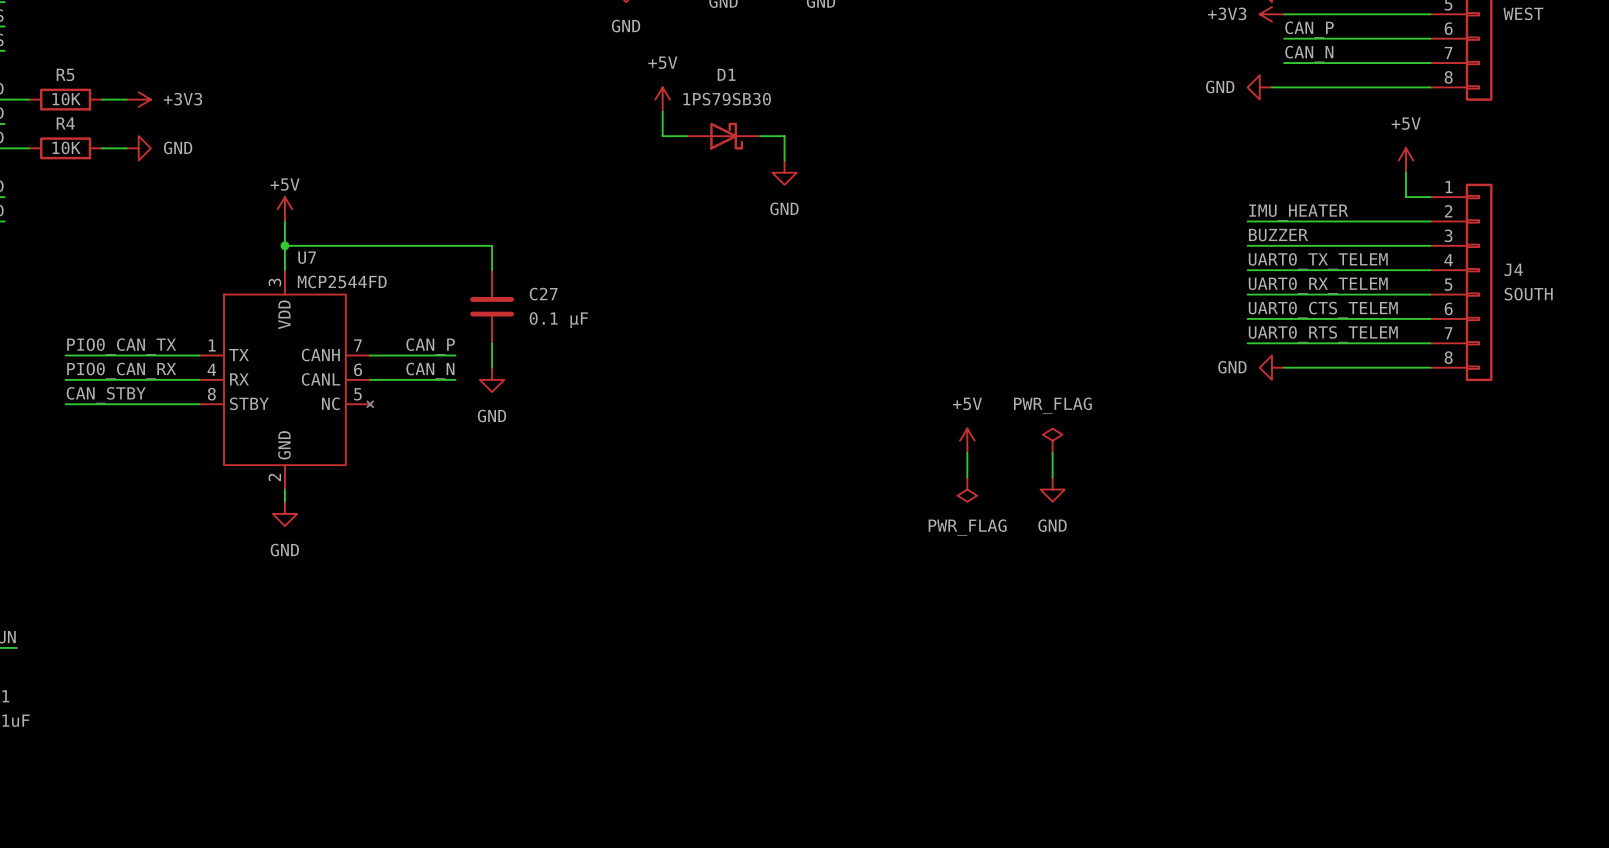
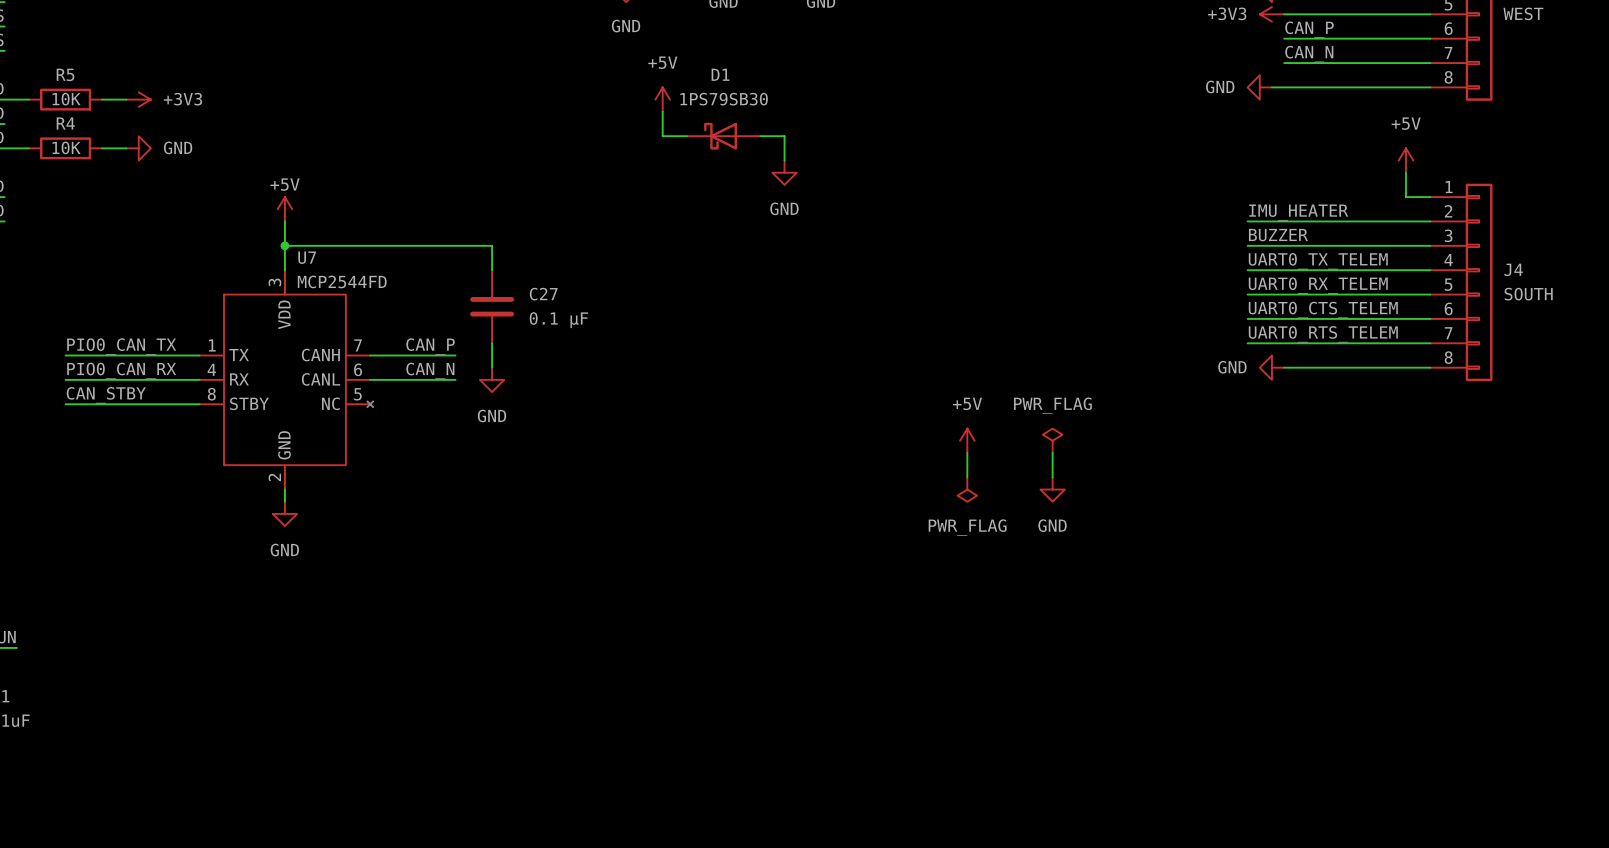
D1 rotation: 0° (726, 136) -> 180° (720, 136)

